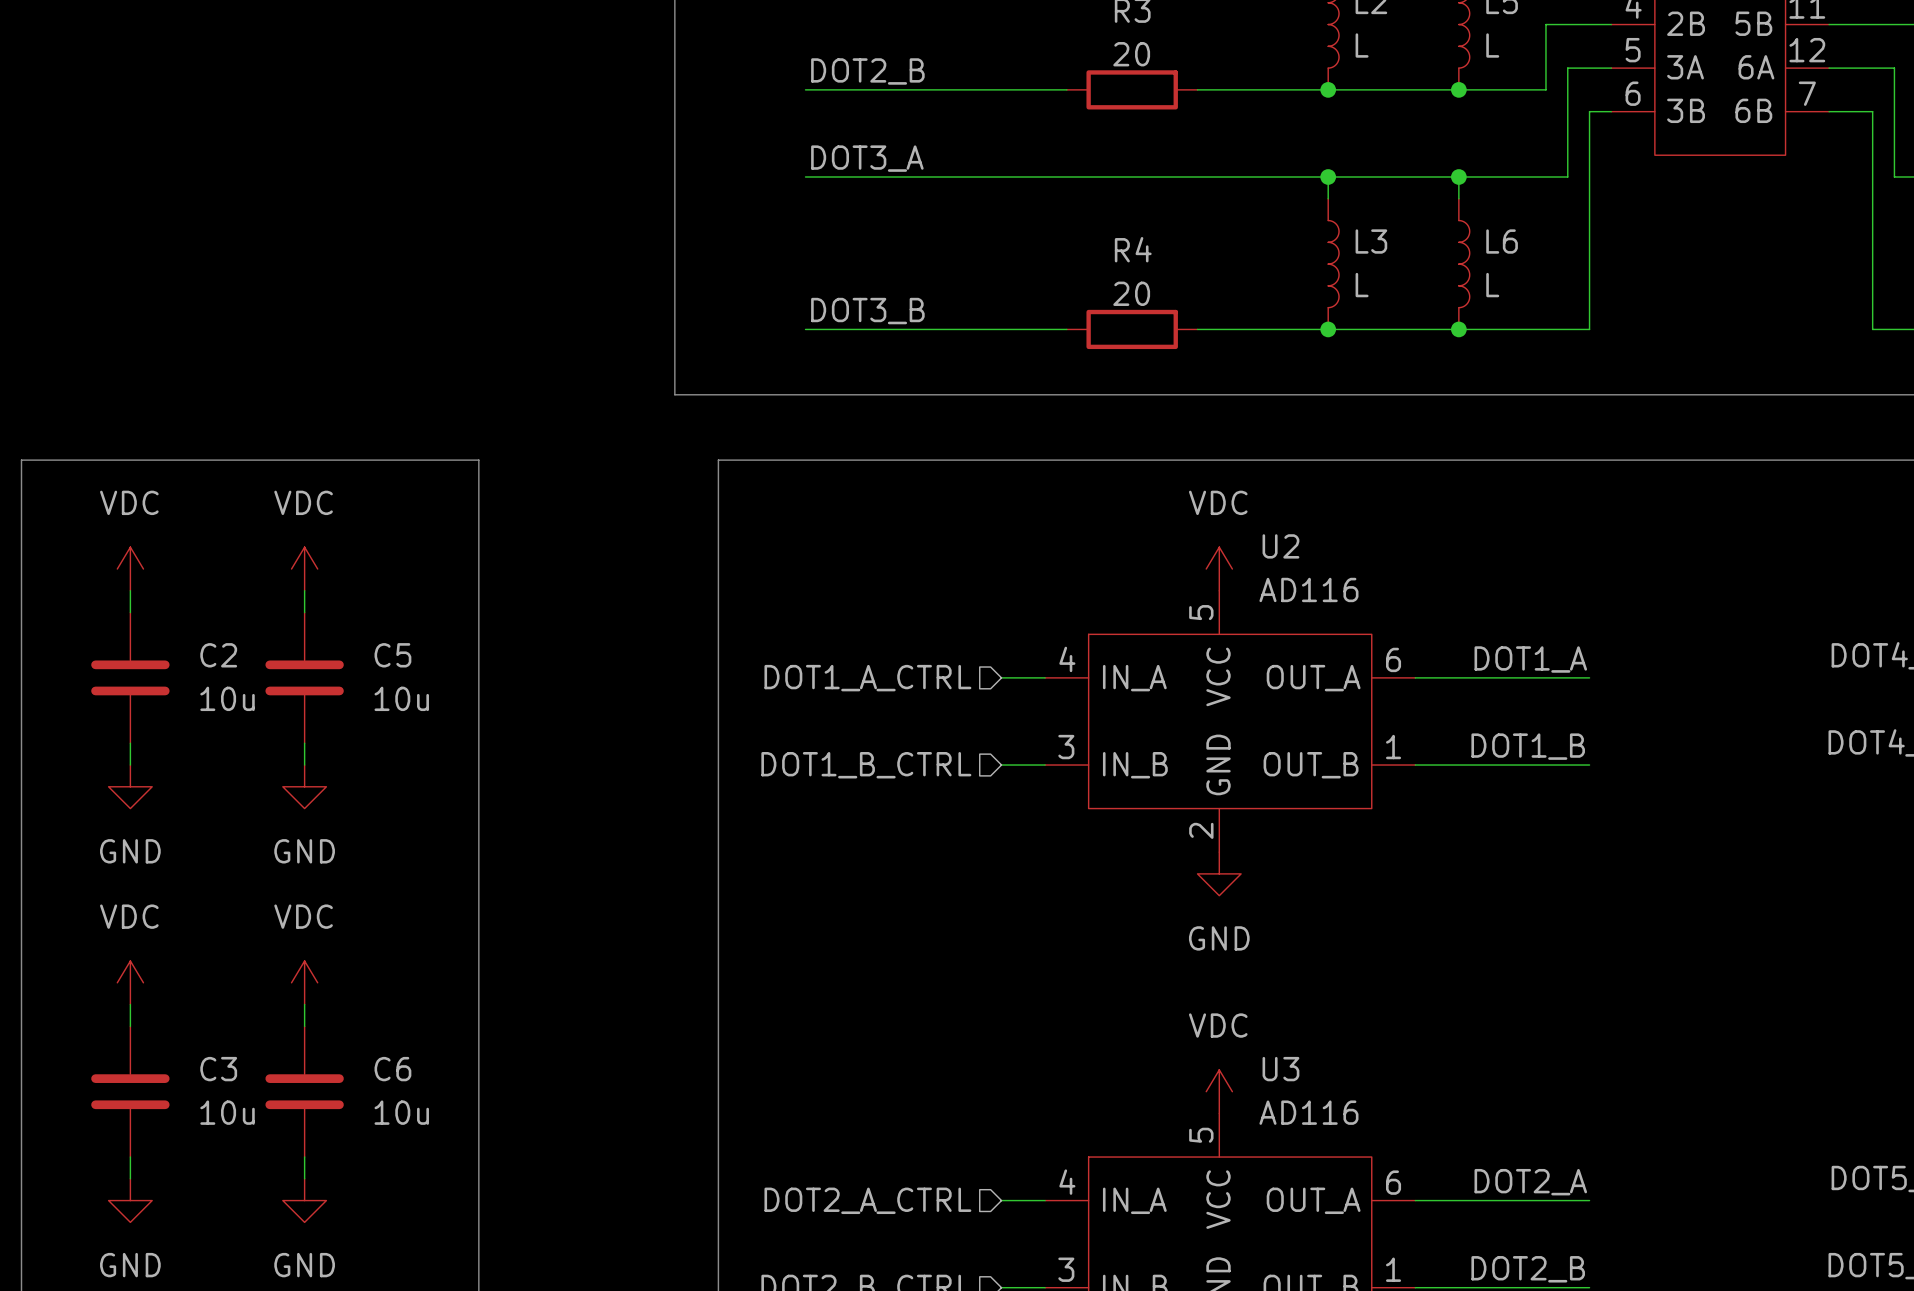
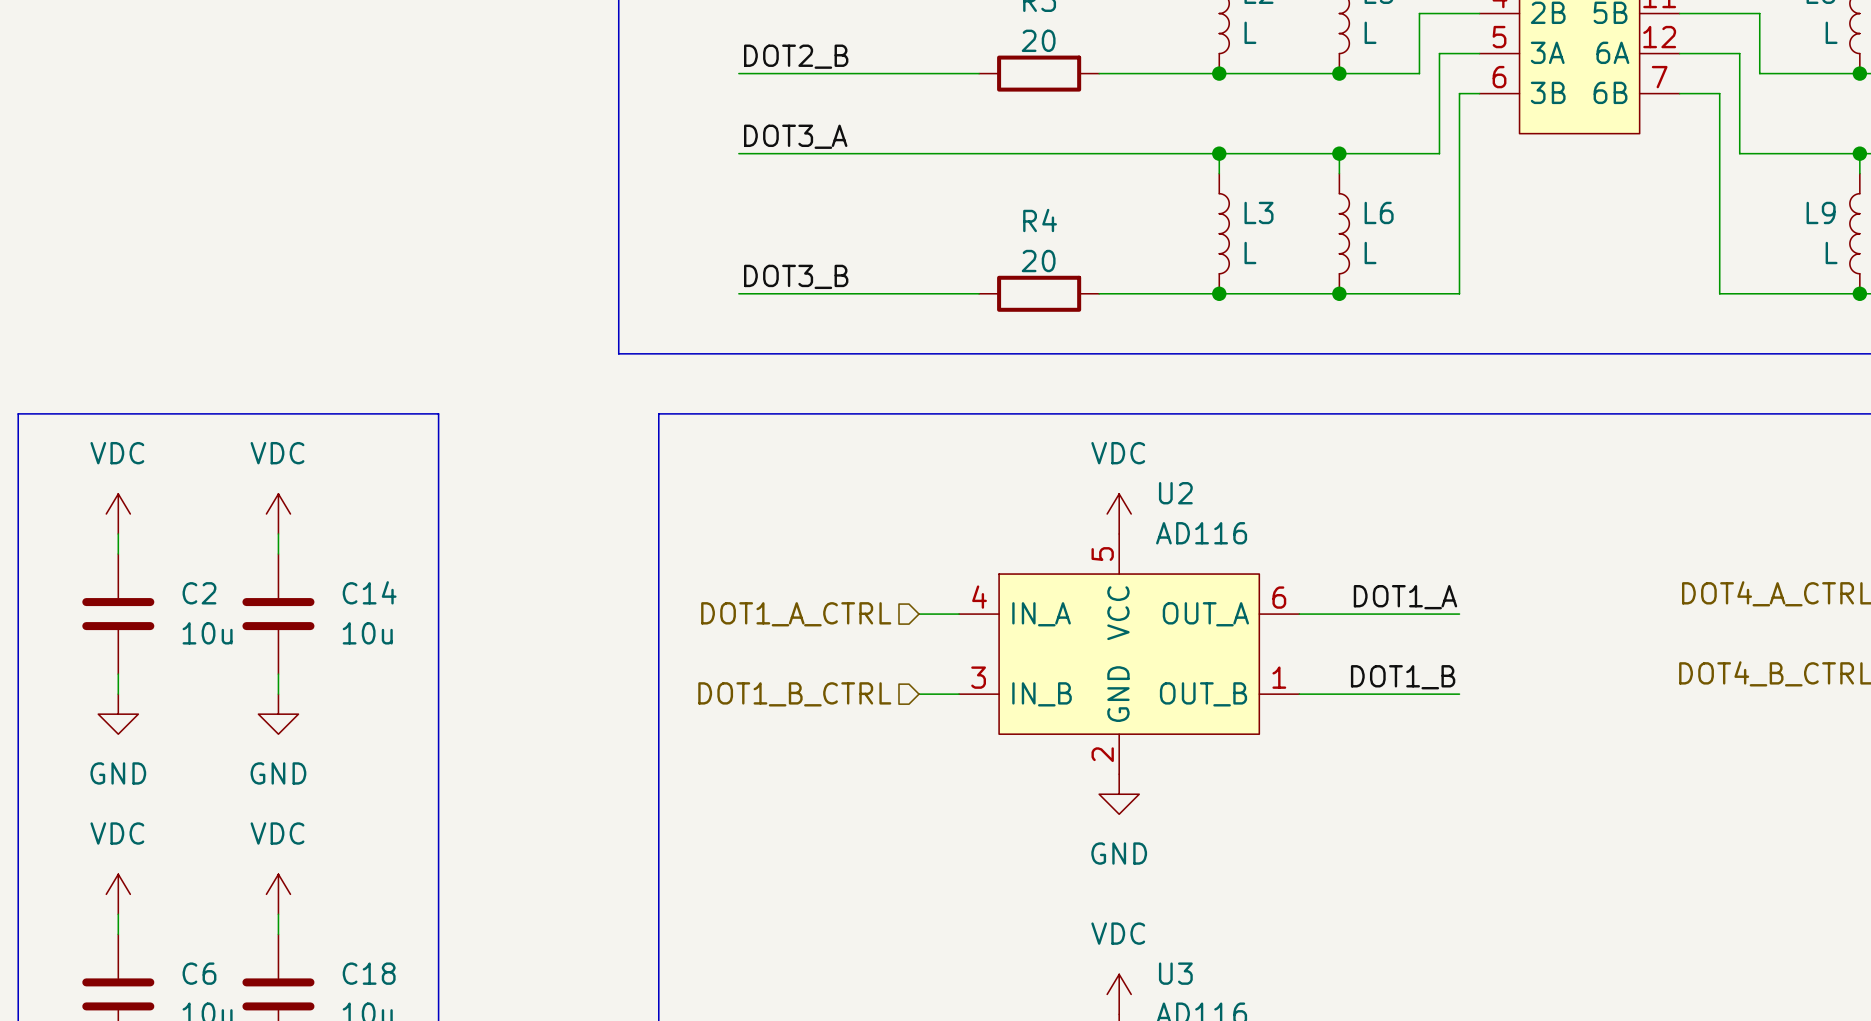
C5 name: C5 (392, 655) -> C14 (369, 592)
C3 name: C3 (218, 1069) -> C6 (199, 973)
C6 name: C6 (392, 1069) -> C18 (369, 973)

